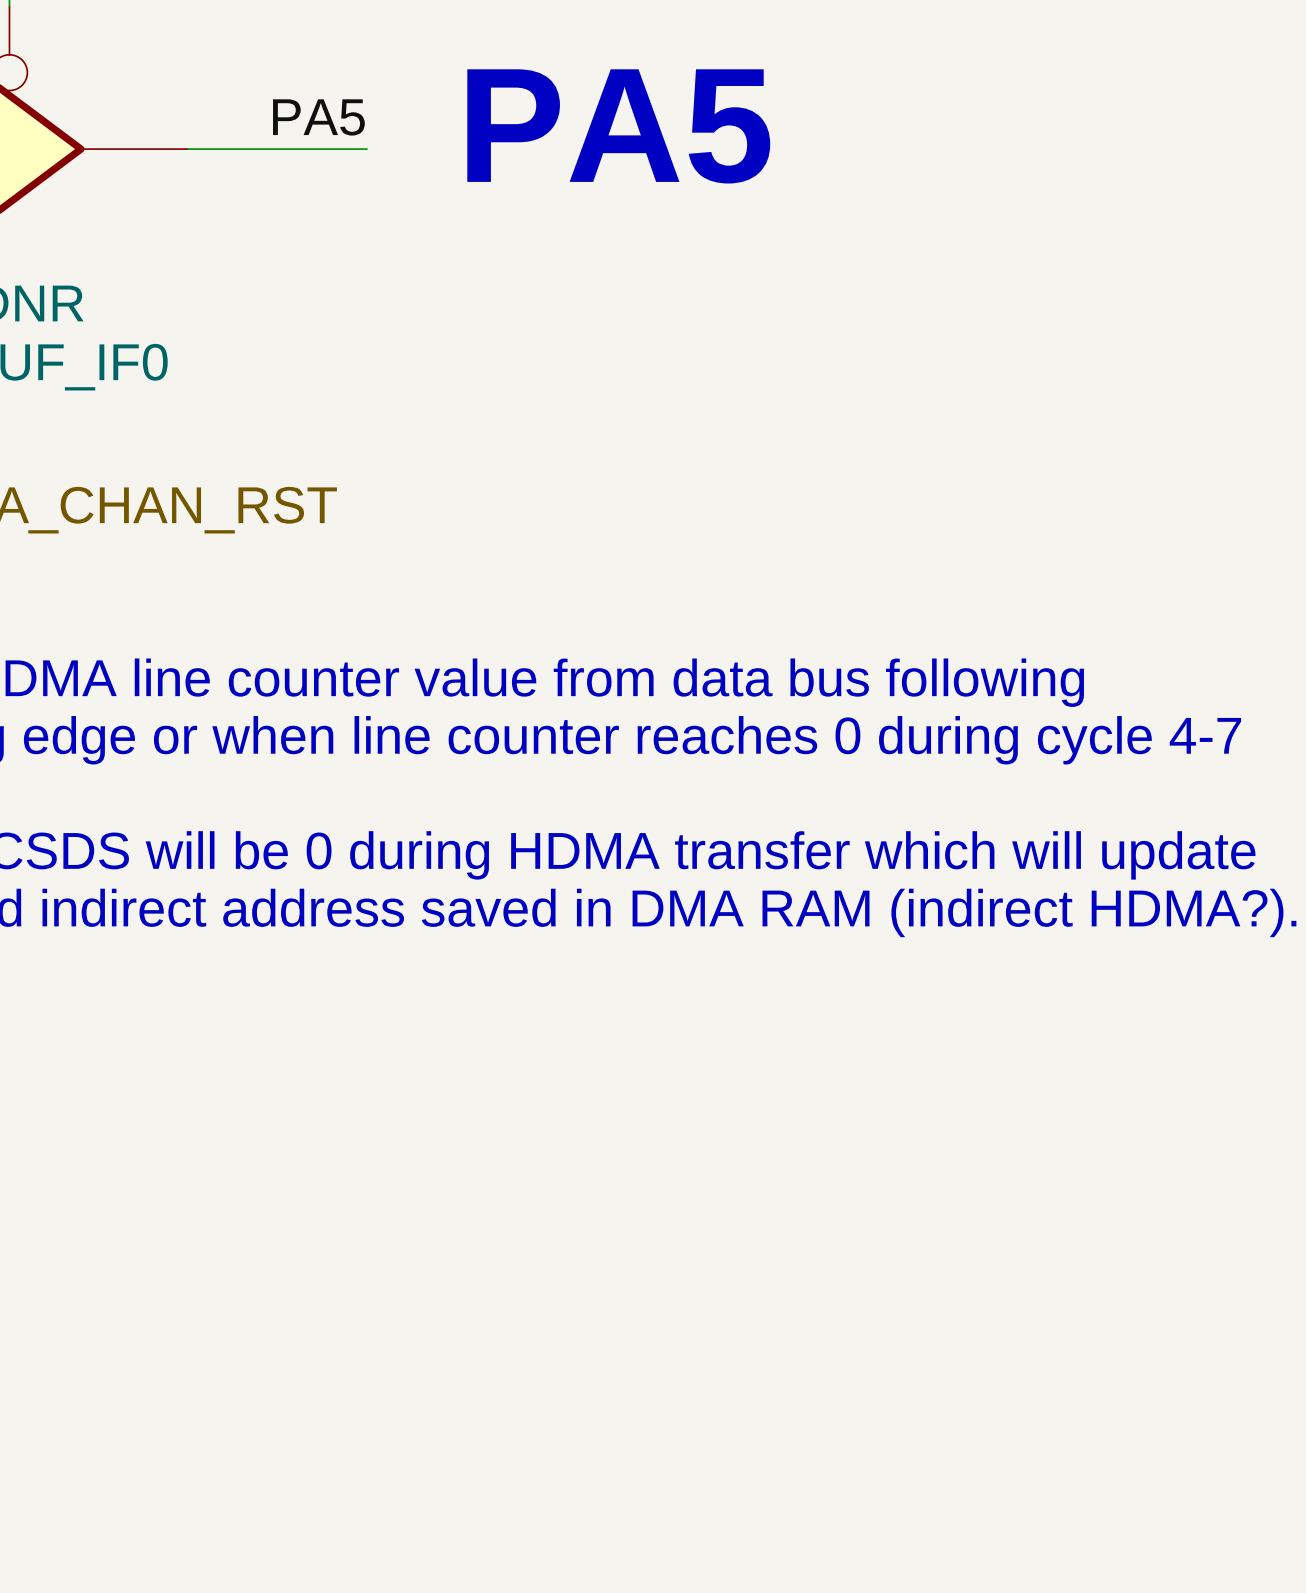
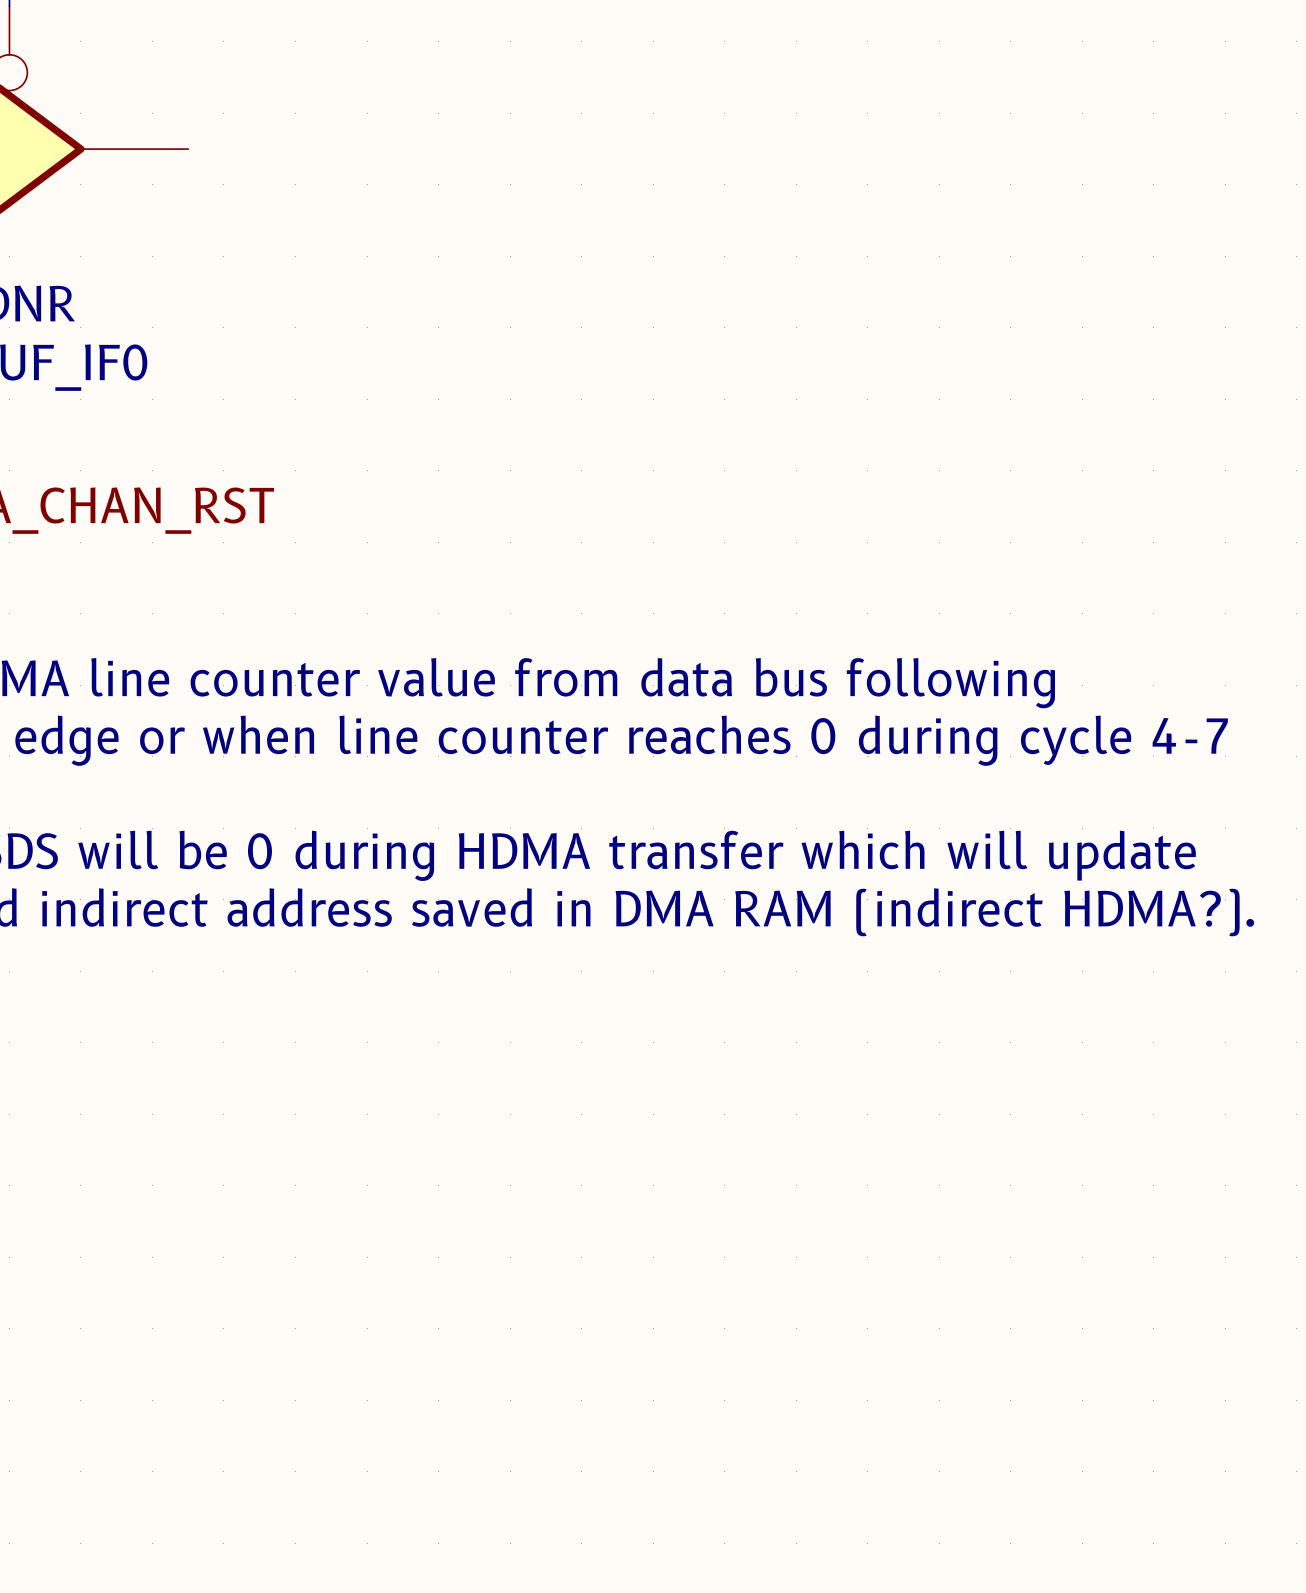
label: PA5 (318, 117) -> none
text: PA5 (618, 126) -> none
wire: (188, 149) (367, 149) -> none

